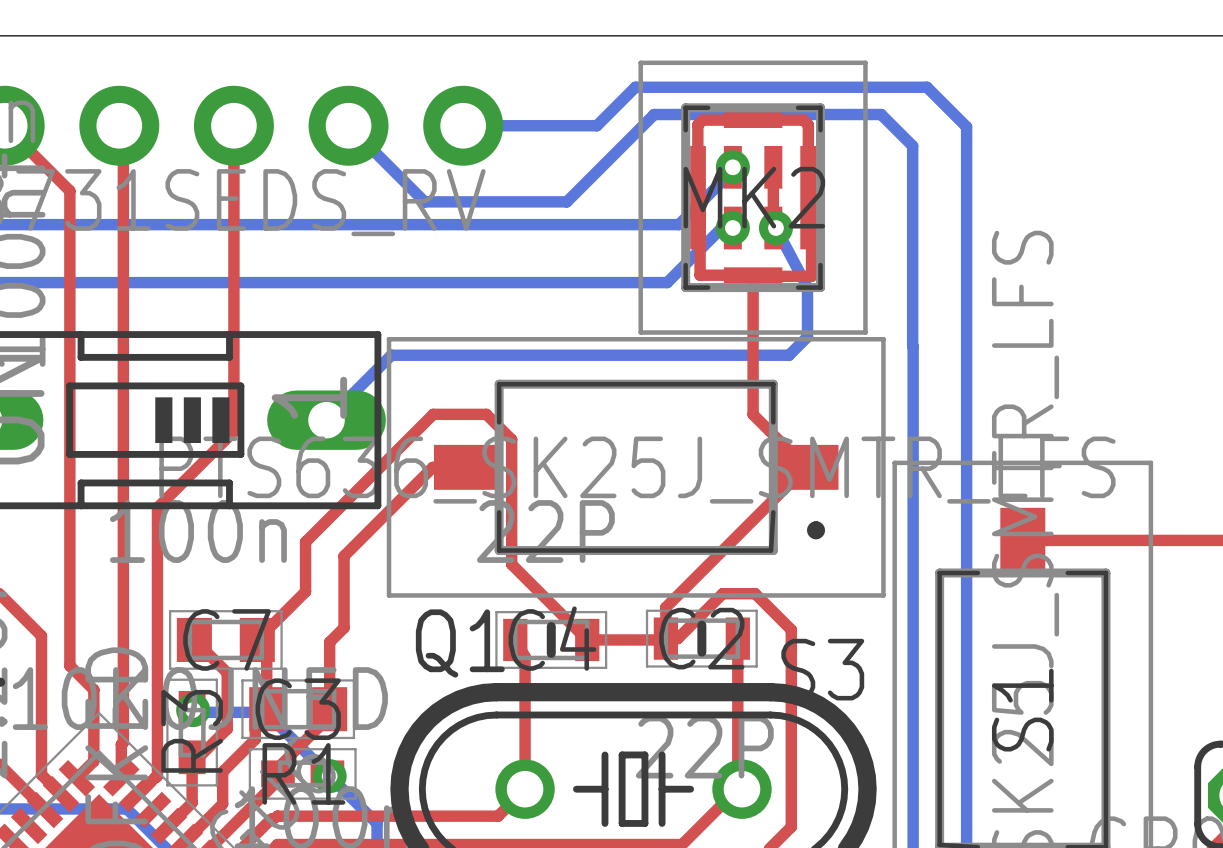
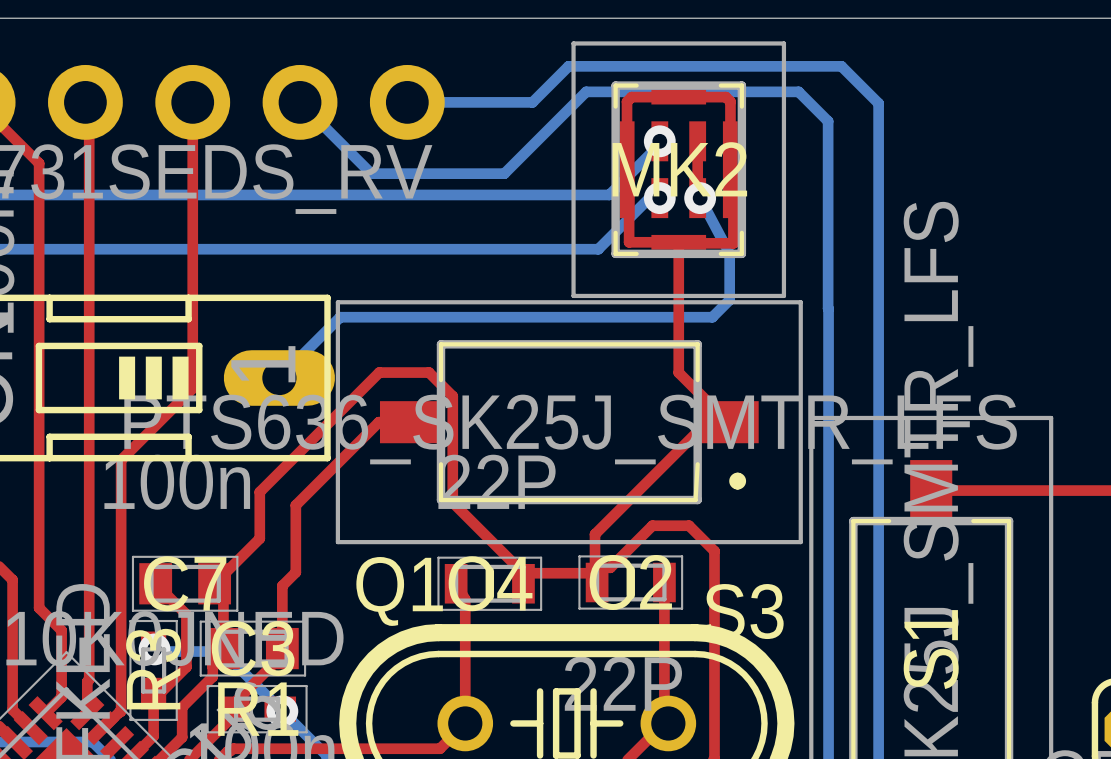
top track: (805, 467) (665, 607) (665, 638) -> (728, 422) (707, 422) (595, 534) (595, 567)
top track: (511, 553) (511, 564) (587, 639) (665, 638) -> (452, 502) (523, 573) (589, 573) (595, 567)
top track: (791, 629) (755, 593) (722, 593) (677, 638) (665, 638) -> (714, 574) (714, 551) (689, 525) (652, 525) (610, 567) (595, 567)

